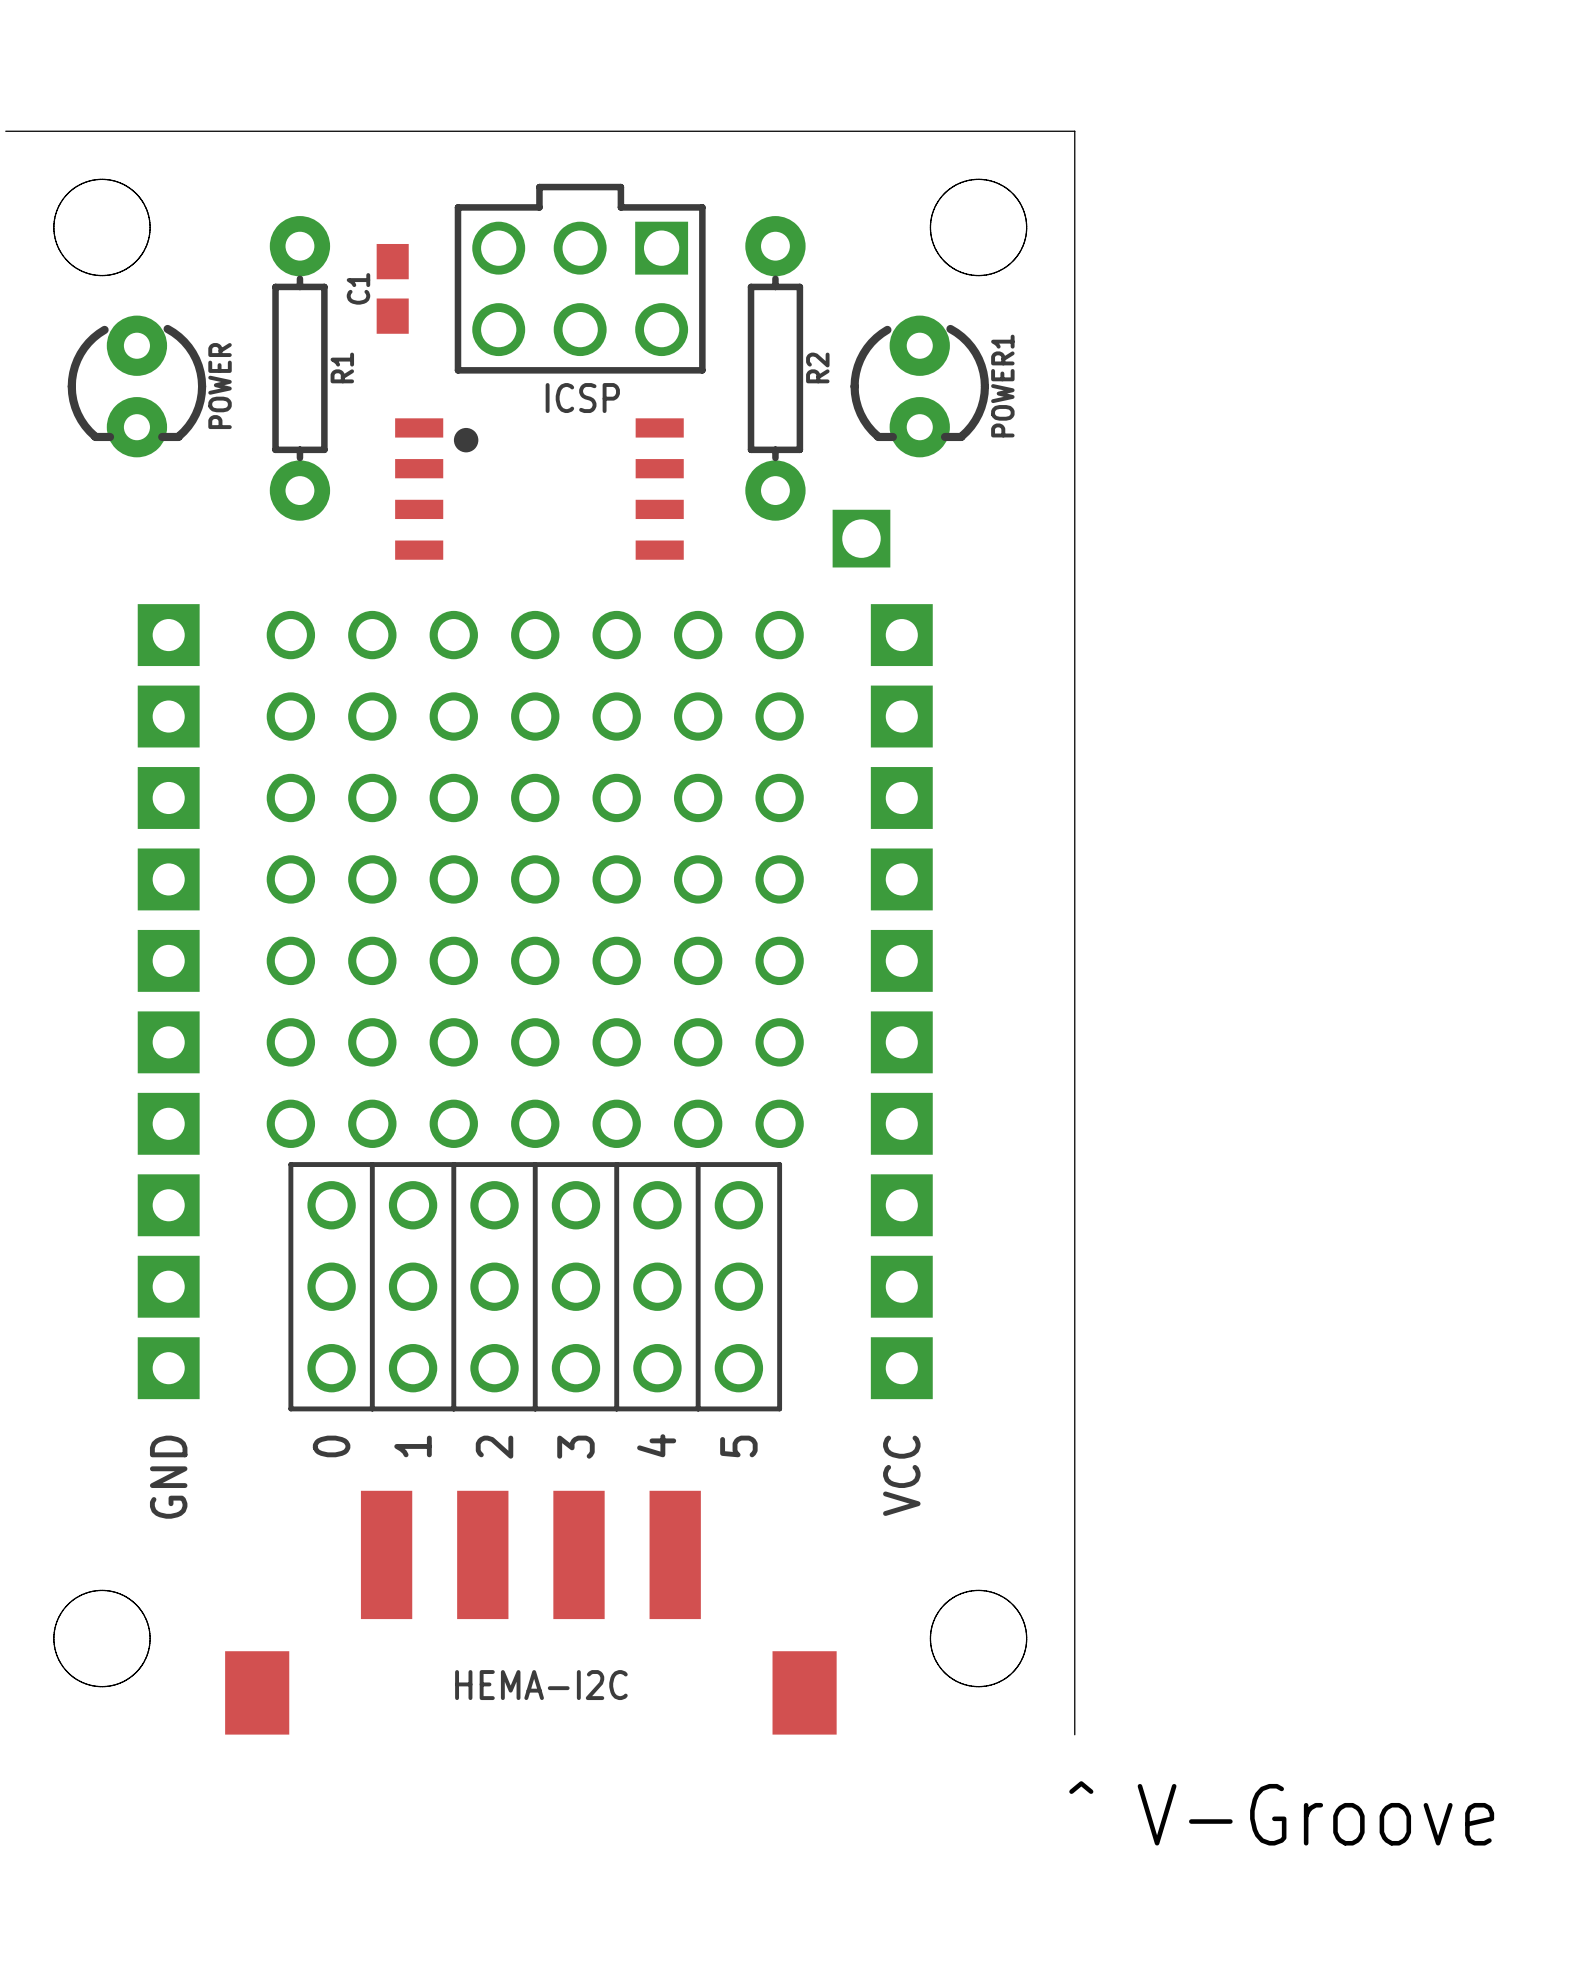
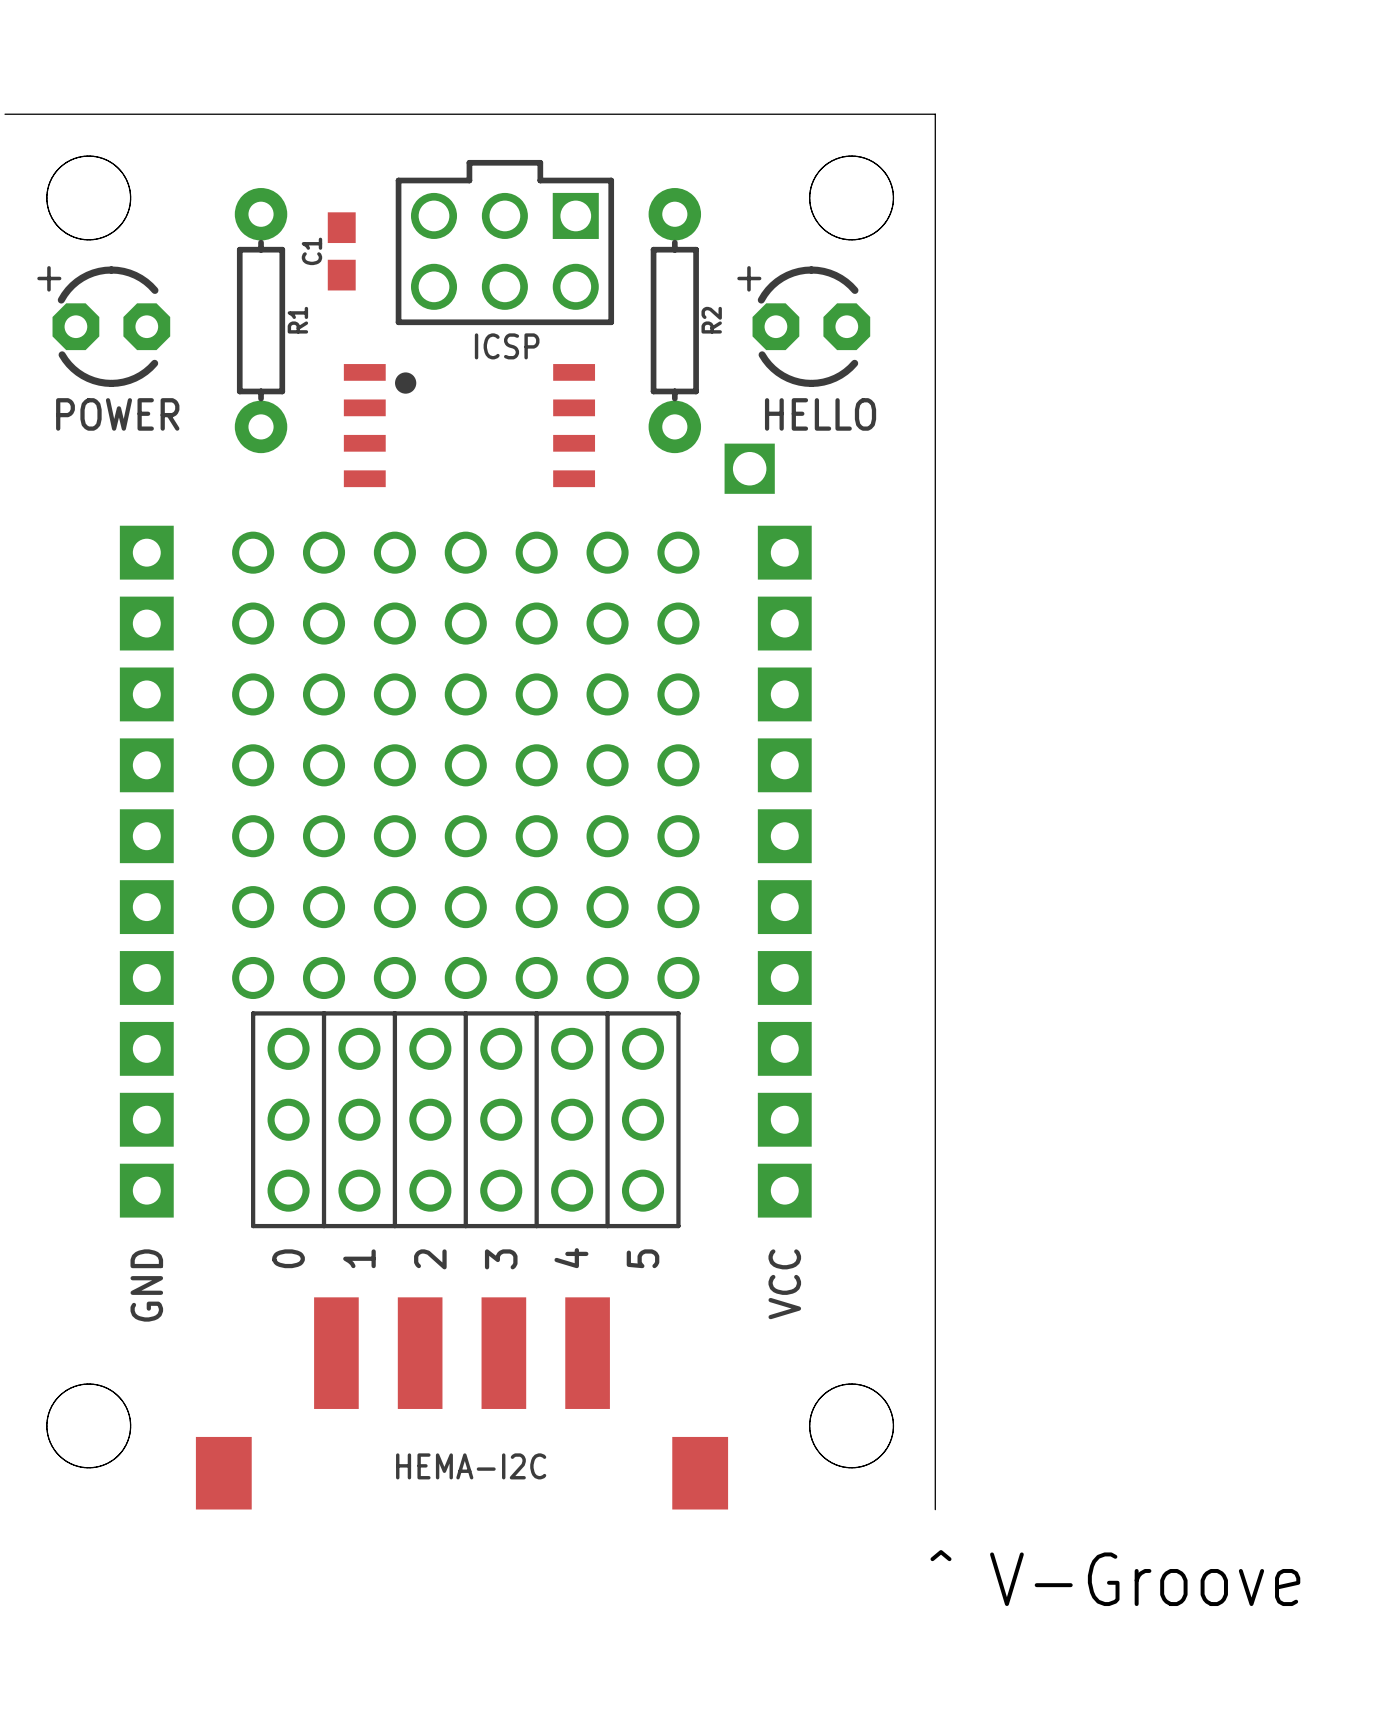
part: none -> (103, 326)
part: none -> (803, 326)
POWER: (136, 386) -> none
POWER1: (919, 386) -> none
text: none -> POWER (117, 414)
text: none -> HELLO (820, 414)

